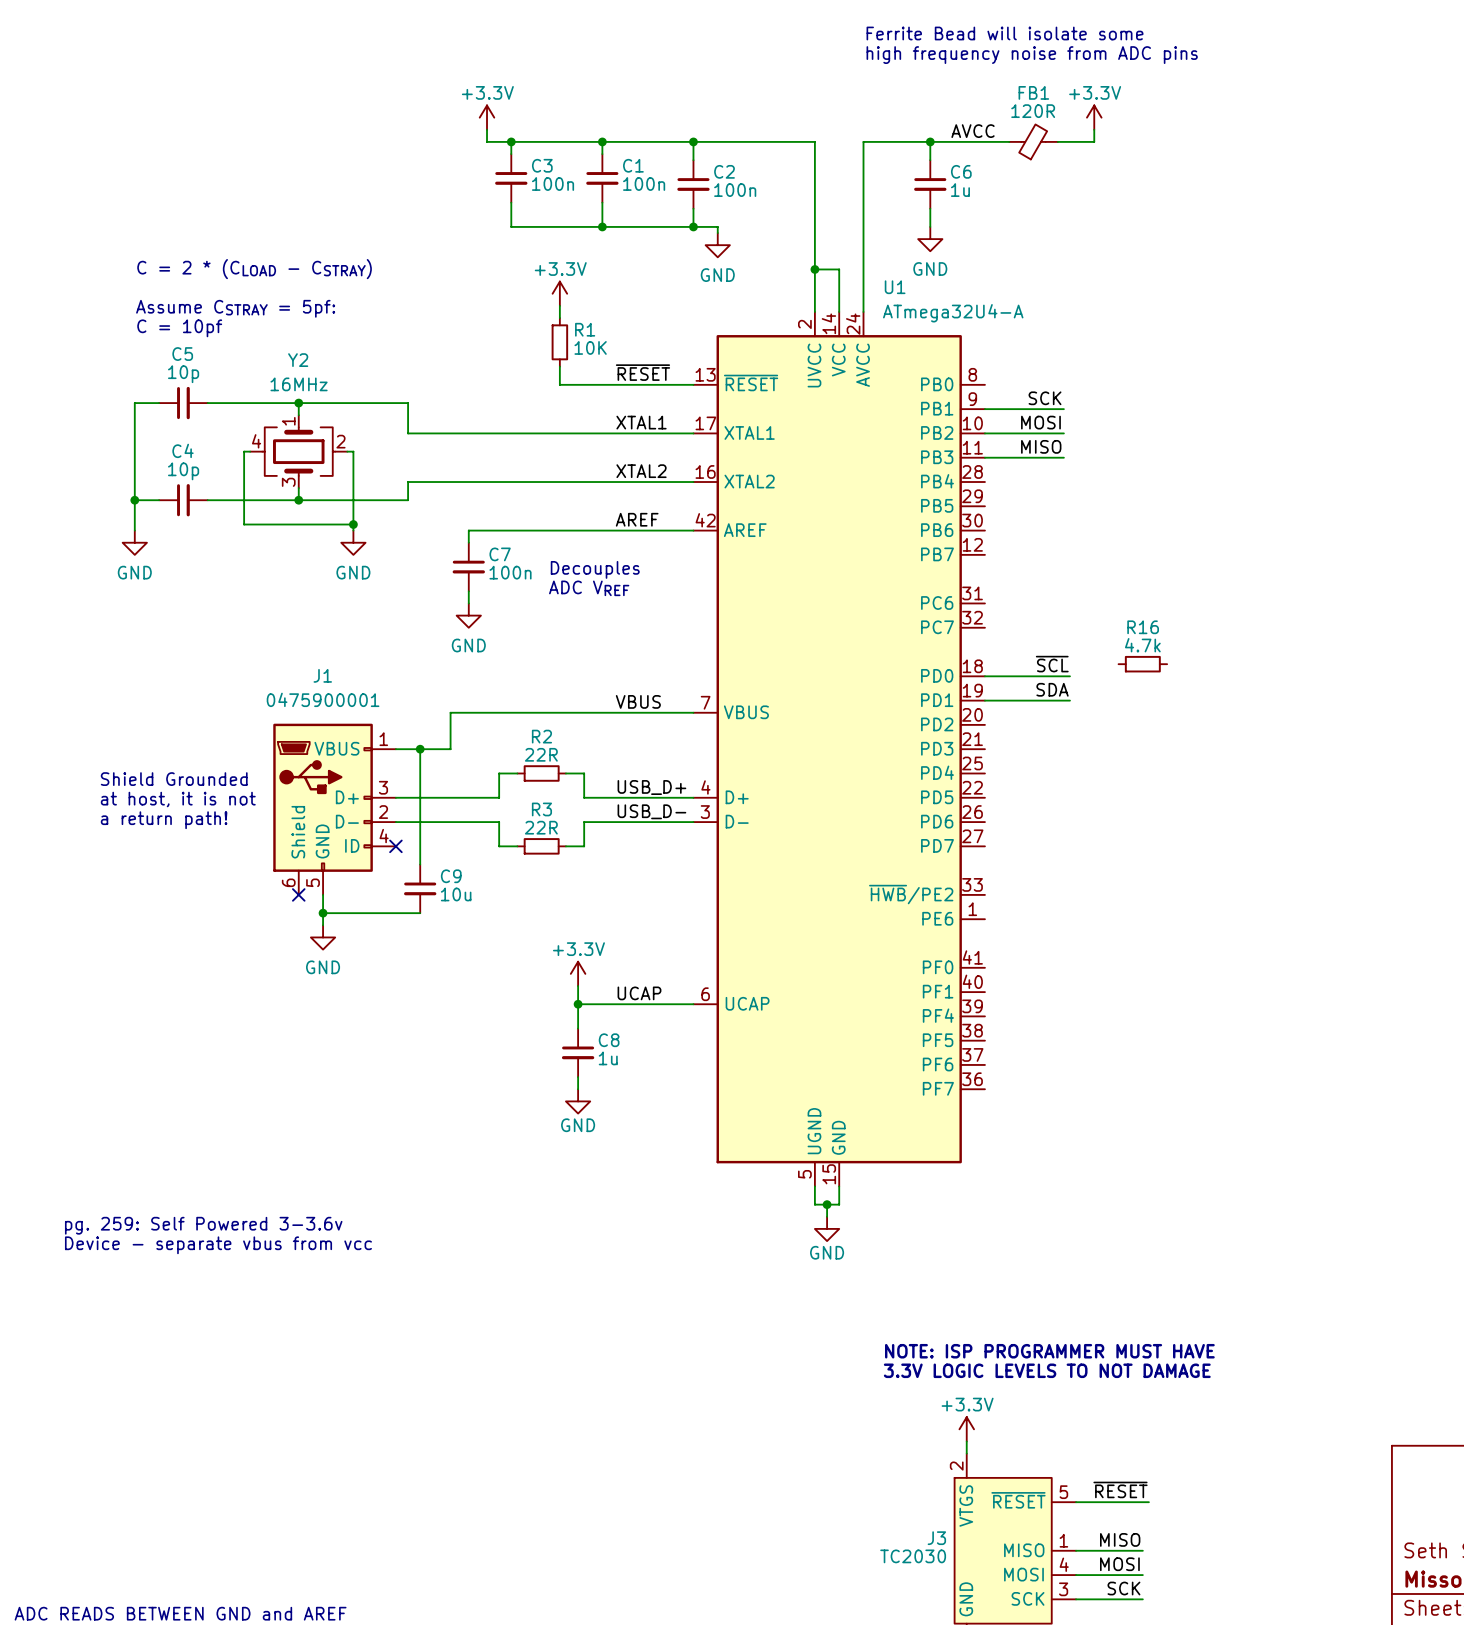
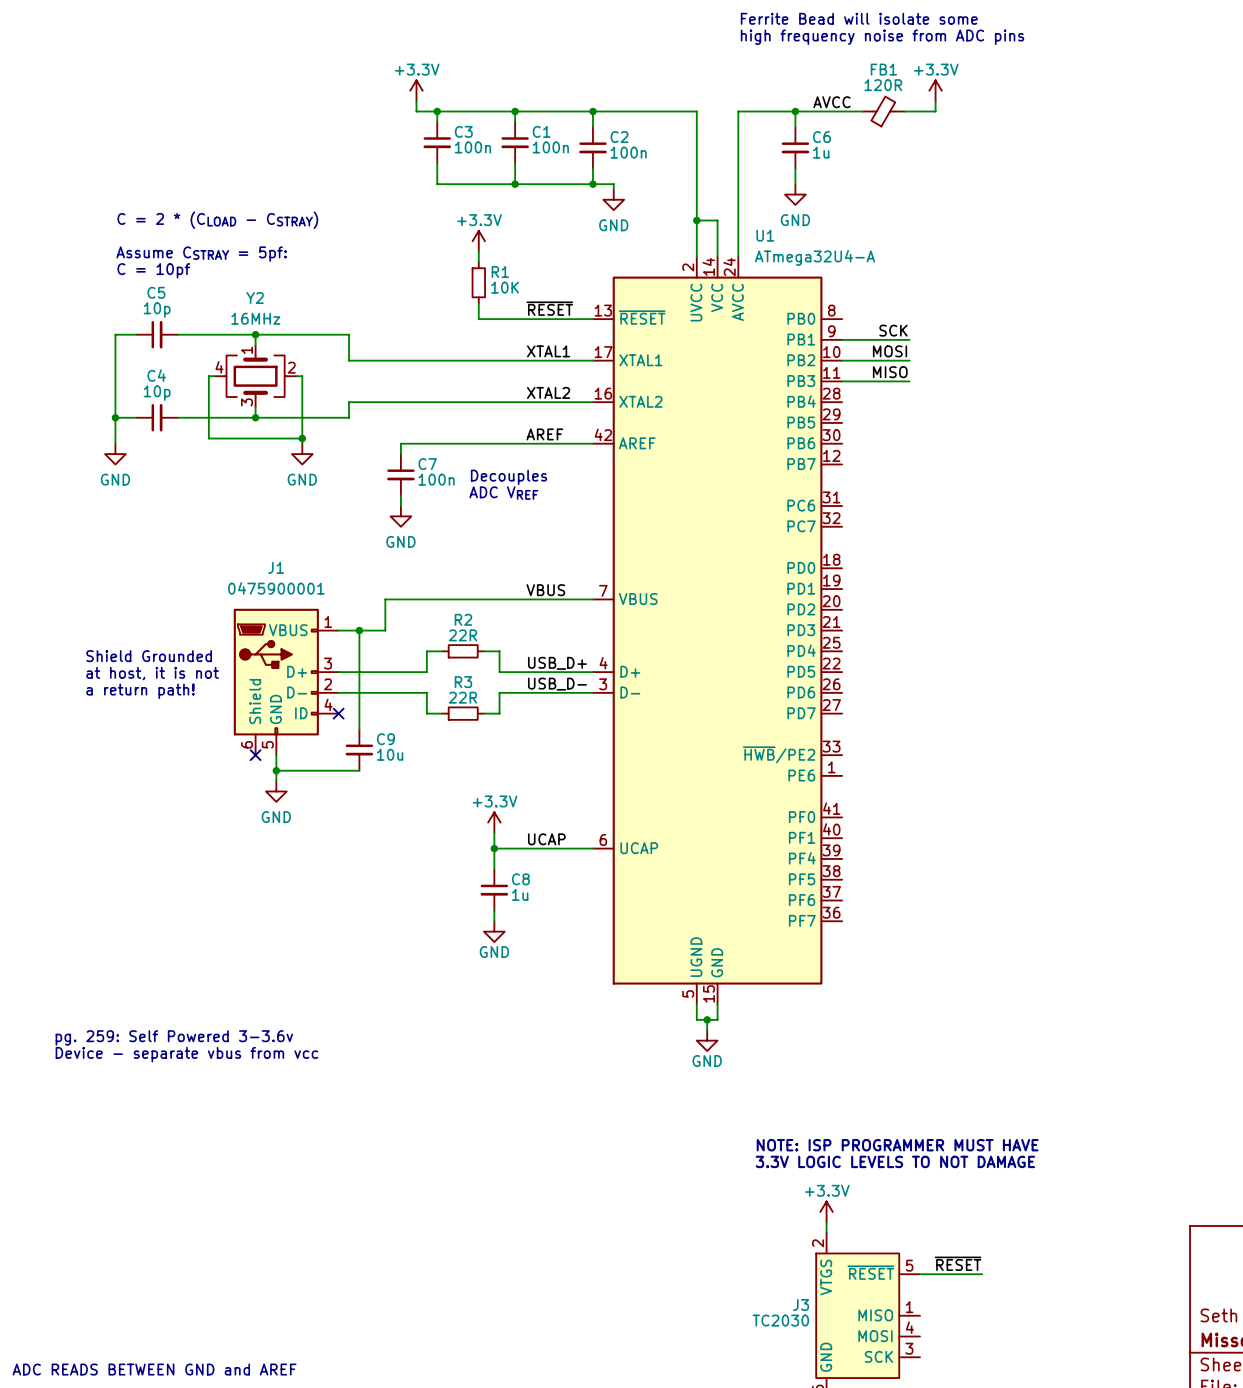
label: ~{SCL} (1052, 664) -> none
R16: 4.7k (1142, 664) -> none
wire: (984, 676) (1069, 676) -> none
label: SDA (1052, 689) -> none
wire: (984, 700) (1069, 700) -> none
label: MISO (1120, 1539) -> none
wire: (1076, 1550) (1142, 1550) -> none
label: MOSI (1119, 1564) -> none
wire: (1076, 1575) (1142, 1575) -> none
label: SCK (1123, 1588) -> none
wire: (1076, 1599) (1142, 1599) -> none

